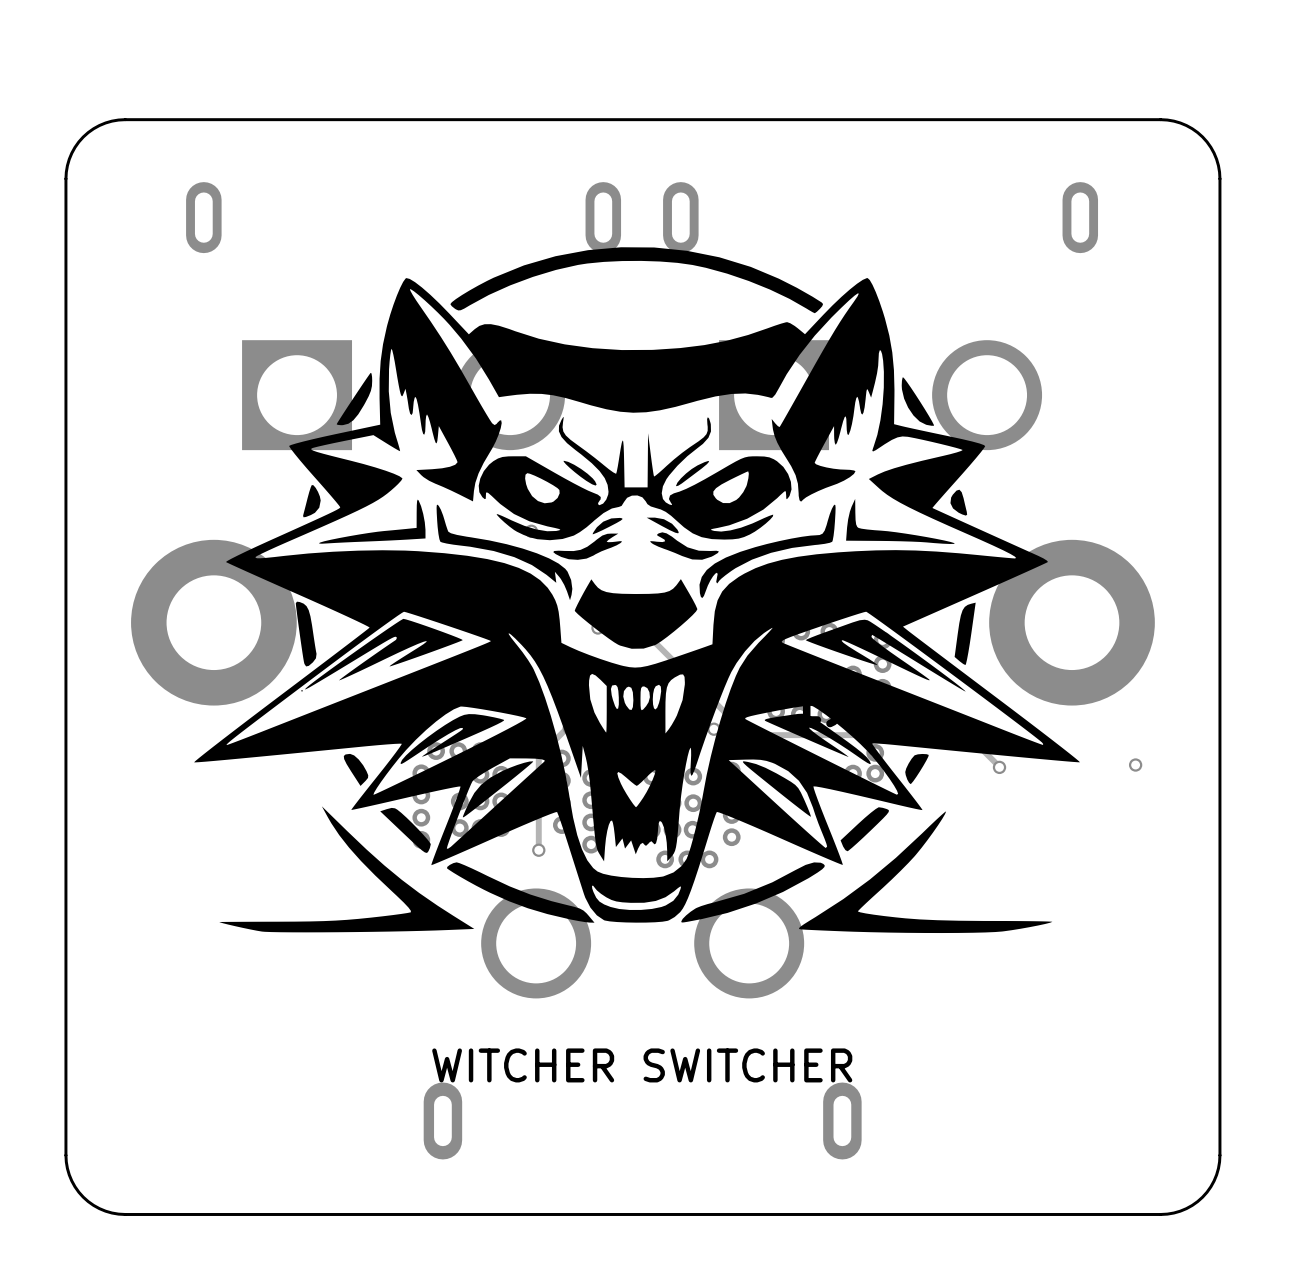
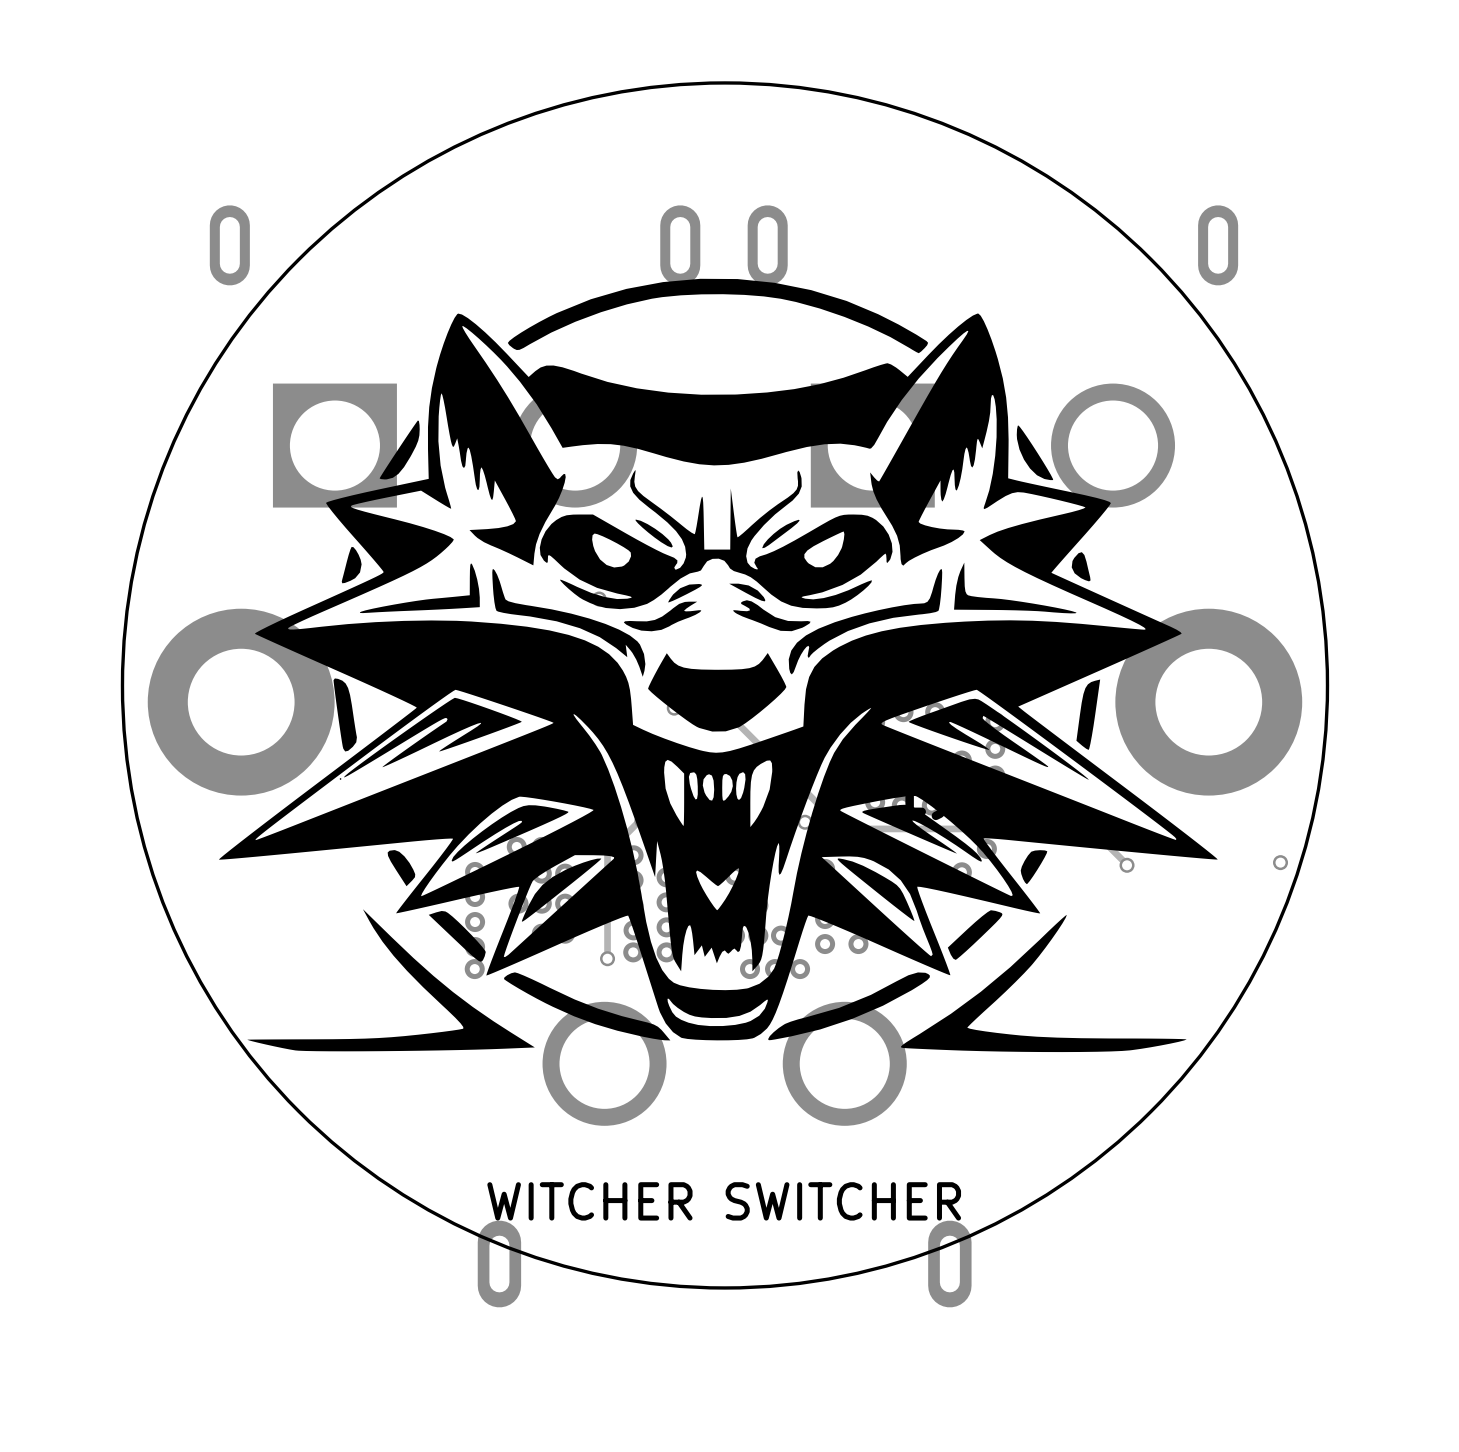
round board edge: none -> [120, 81, 1330, 1290]
board edge: (1160, 119) (125, 119) (105, 122) (83, 136) (71, 153) (65, 178) (65, 1155) (71, 1180) (83, 1197) (105, 1211) (125, 1214) (1160, 1214) (1186, 1208) (1202, 1197) (1216, 1174) (1219, 1155) (1219, 178) (1214, 153) (1202, 136) (1186, 125) (1160, 119) -> none
via: (436, 751) -> none
via: (875, 773) -> none
via: (693, 776) -> none
via: (693, 803) -> none
via position: (459, 828) -> (474, 969)
via: none -> (858, 944)
via: none -> (633, 952)

